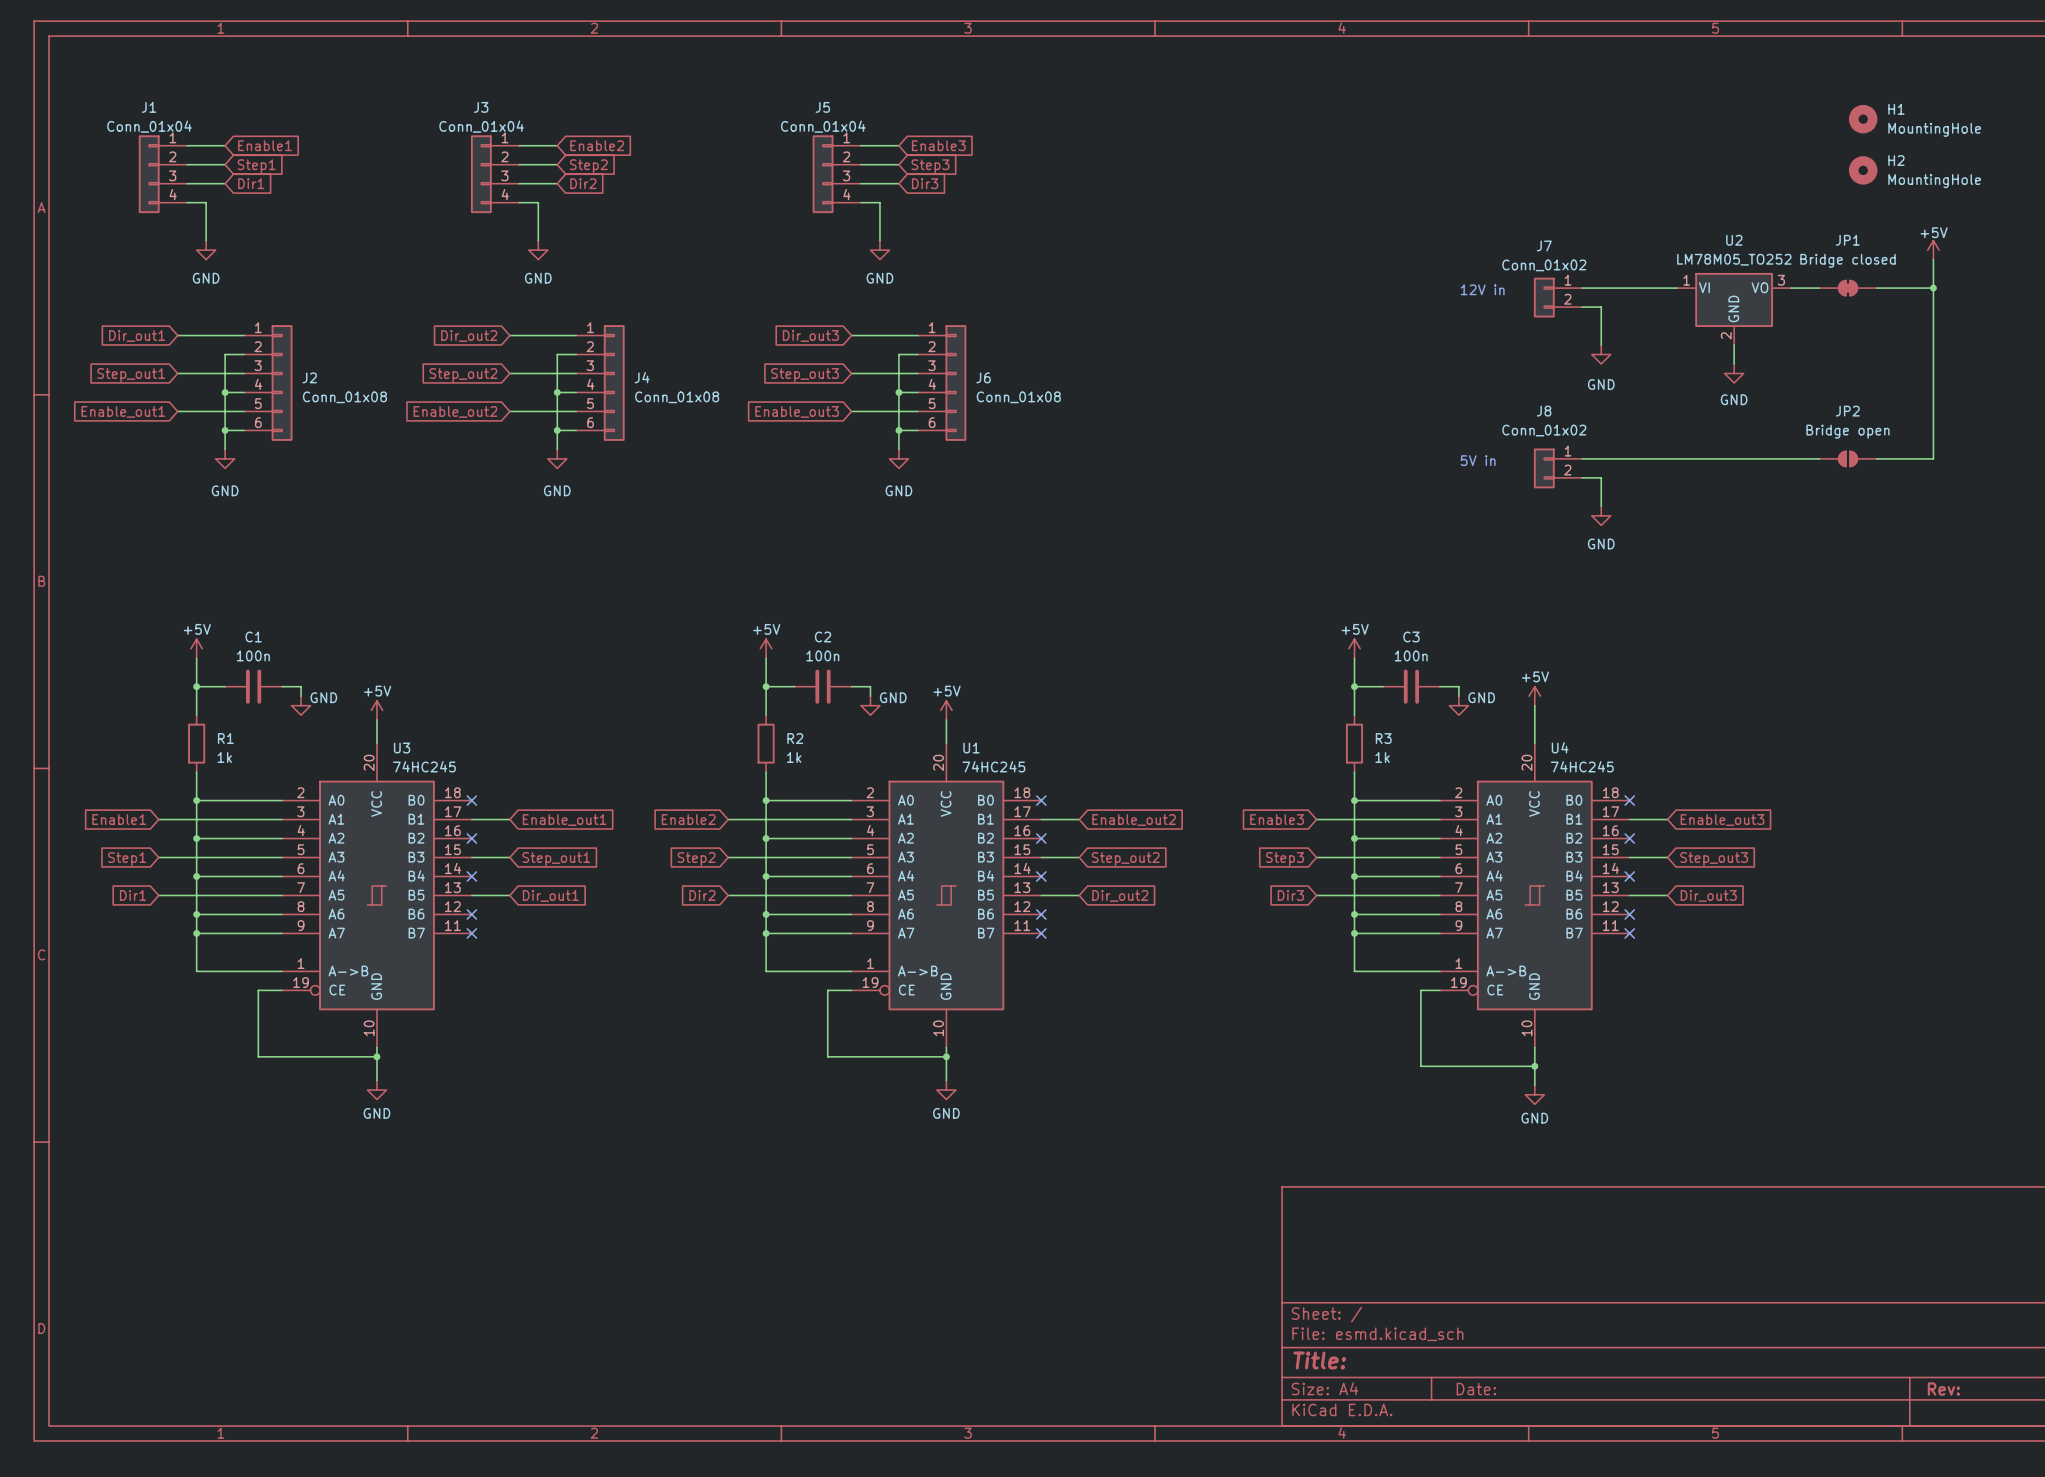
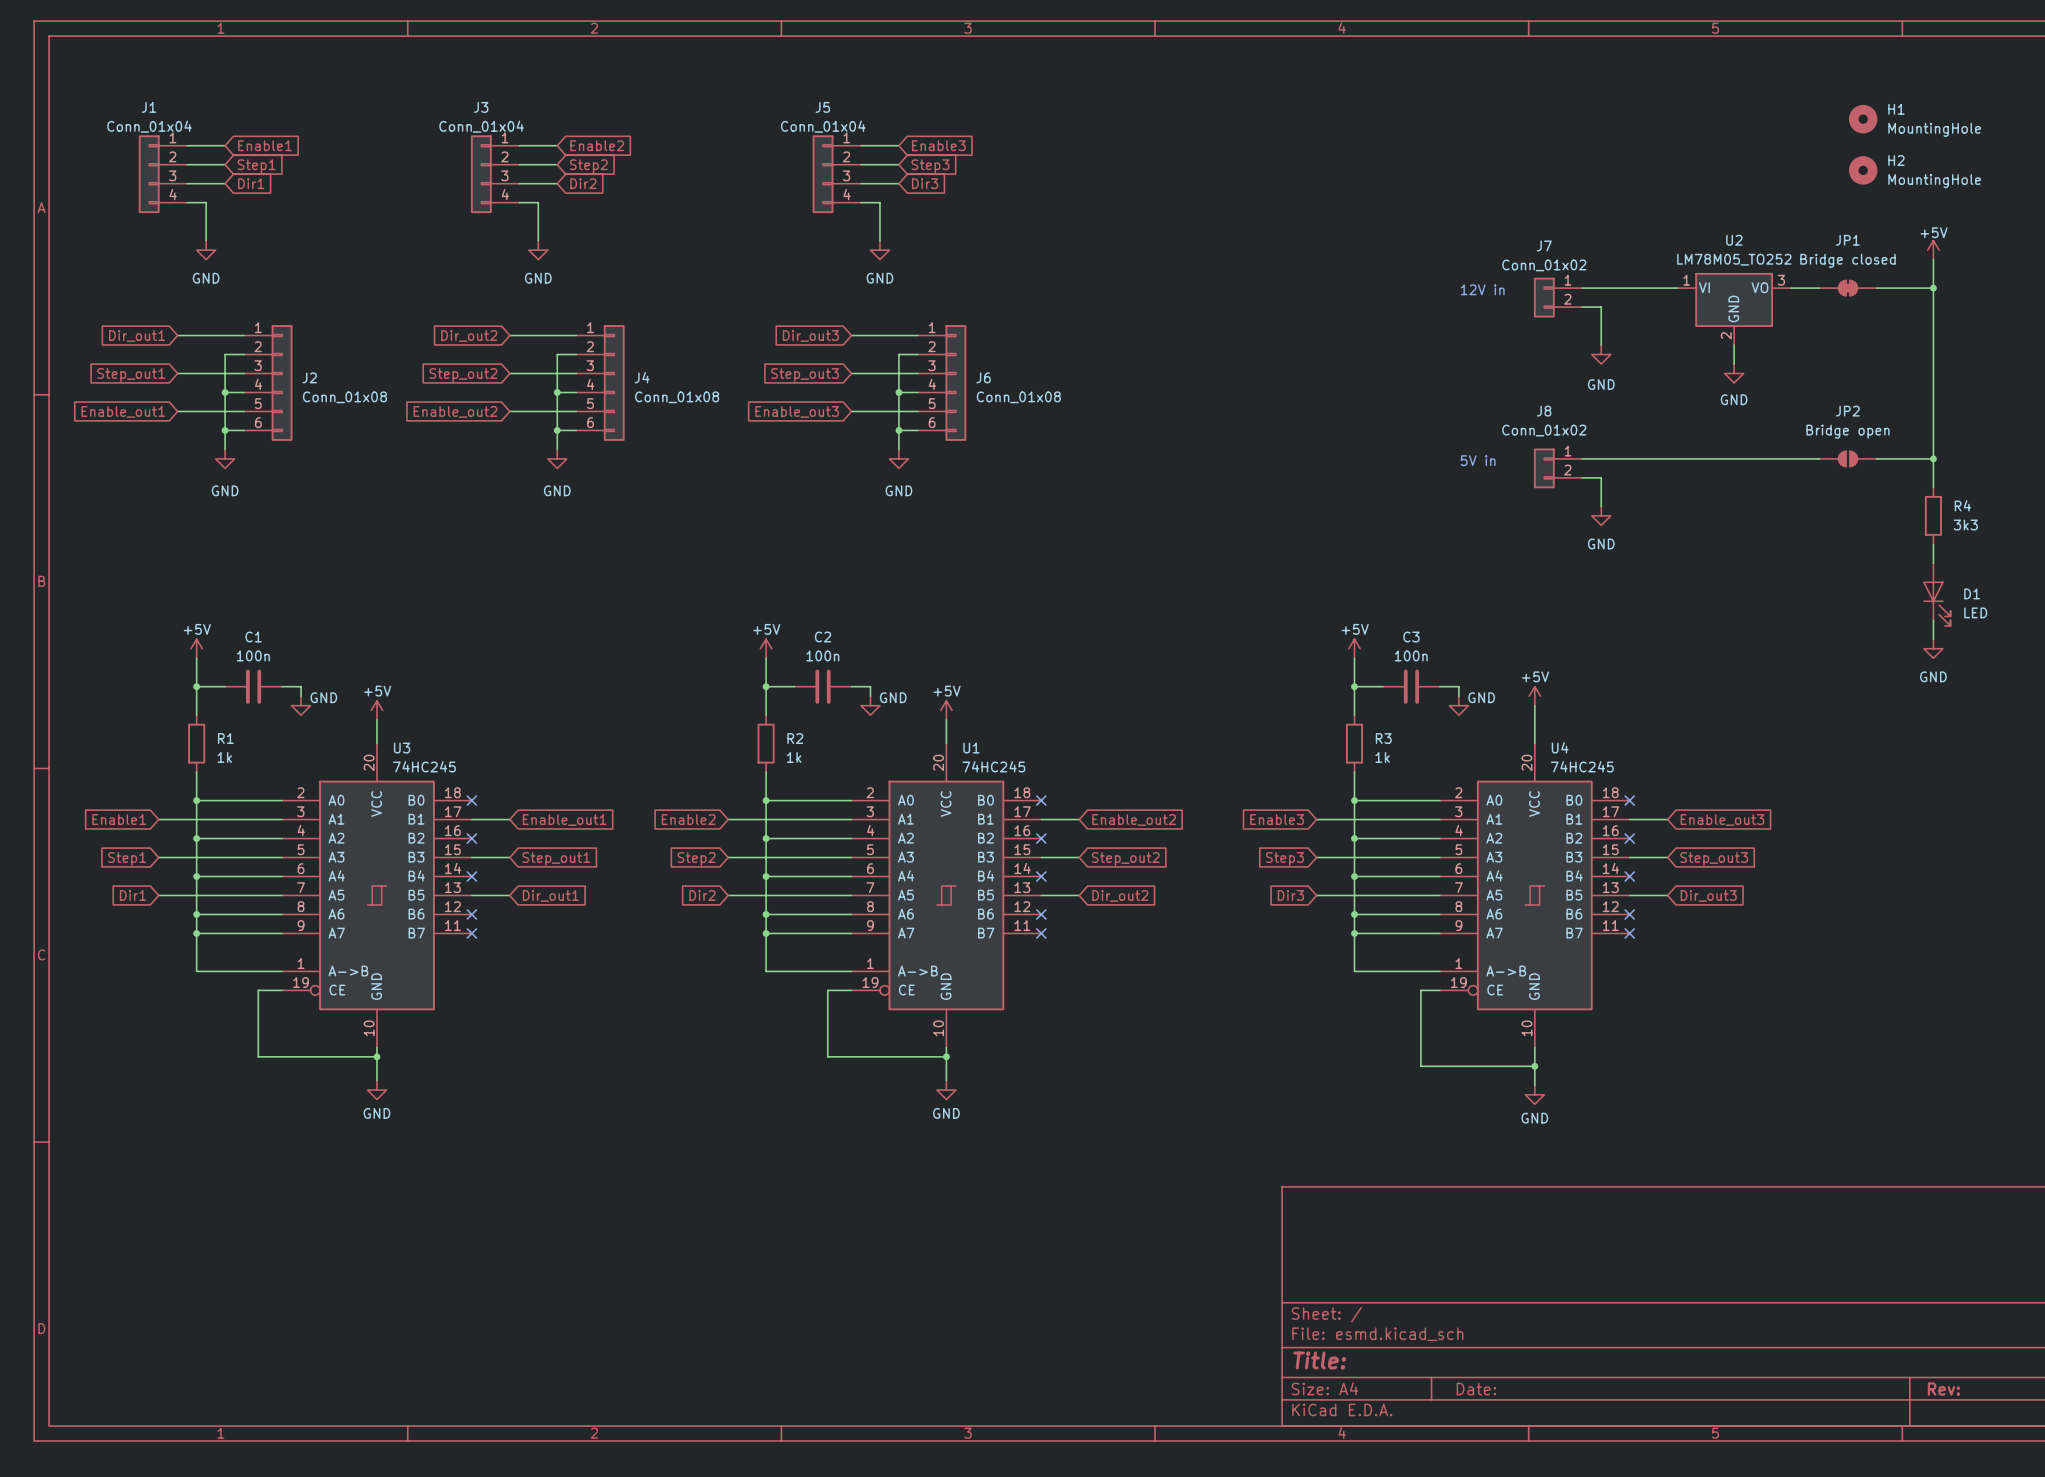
wire: none -> (1933, 458) (1933, 487)
junction: none -> (1933, 458)
R4: none -> 3k3 (1933, 515)
wire: none -> (1933, 544) (1933, 563)
D1: none -> LED (1936, 594)
wire: none -> (1933, 620) (1933, 639)
power symbol: none -> GND (1933, 648)

